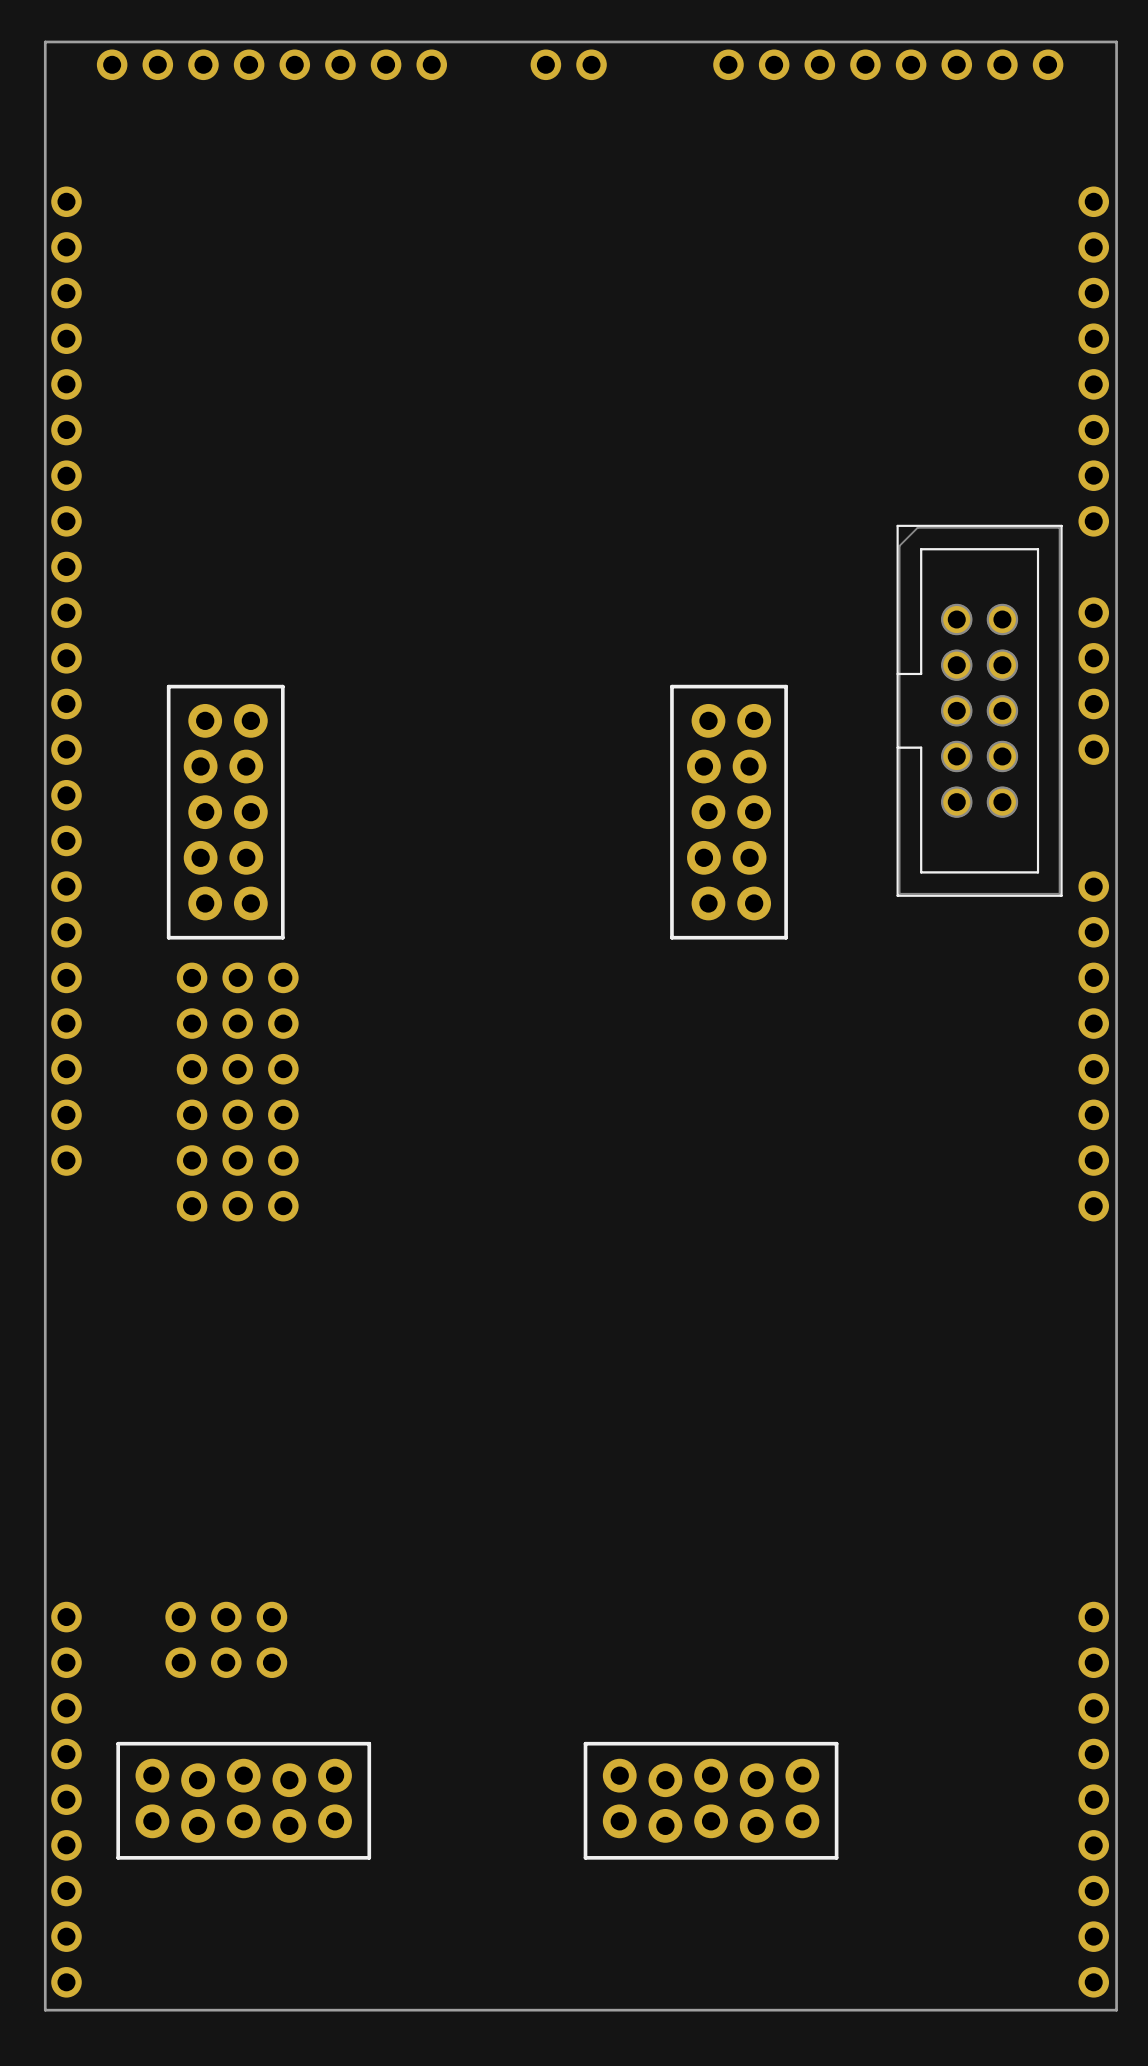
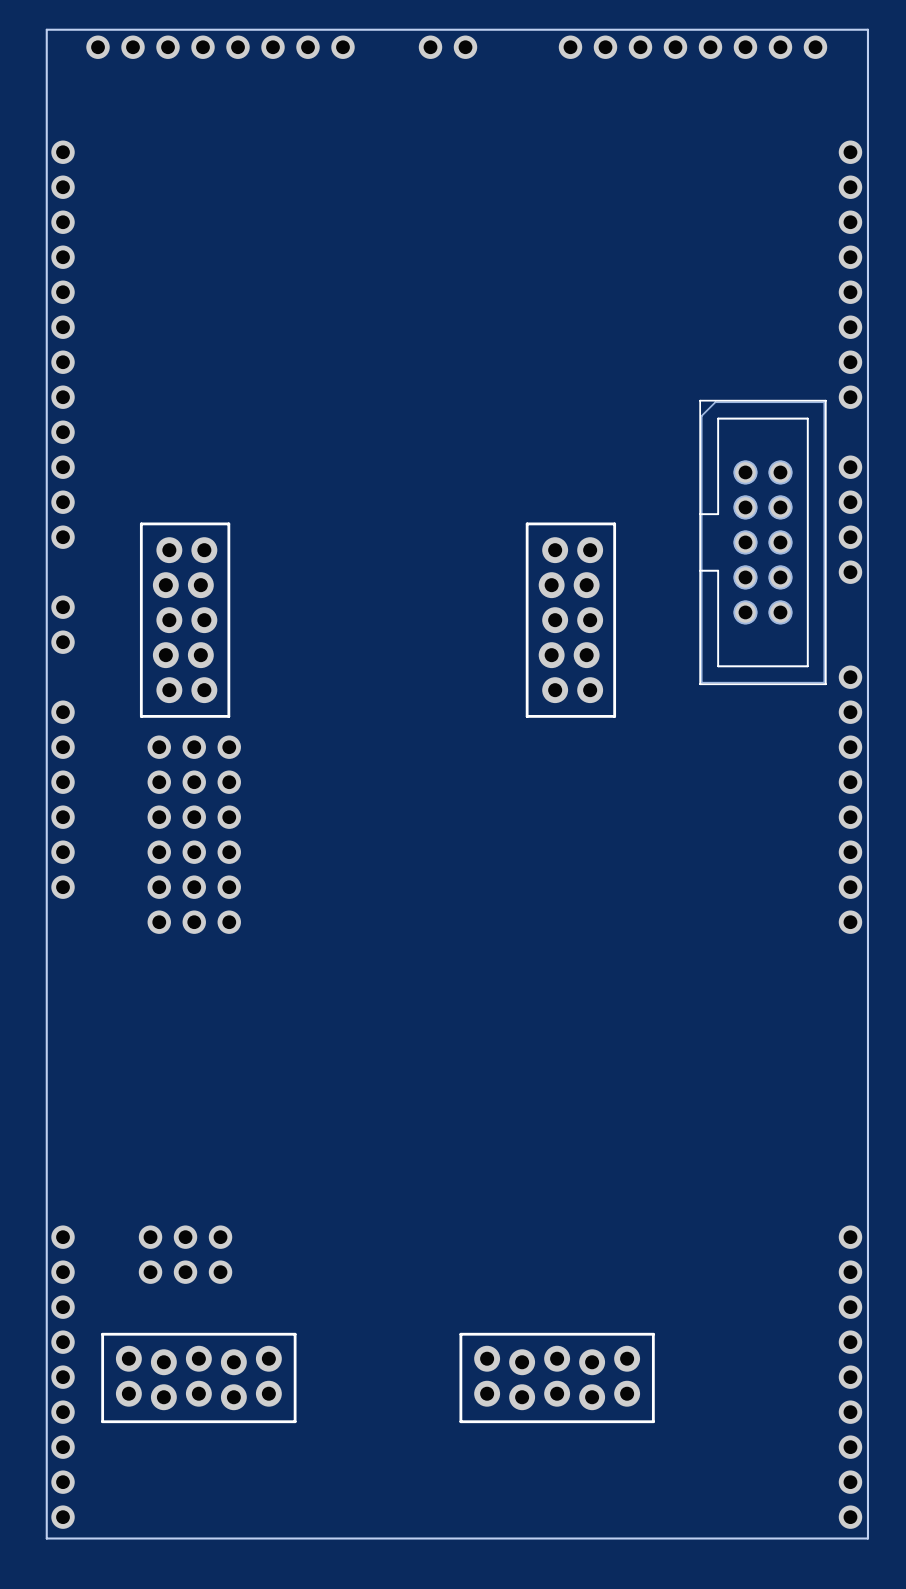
part footprint: [51, 734, 82, 902] -> [51, 595, 75, 654]

